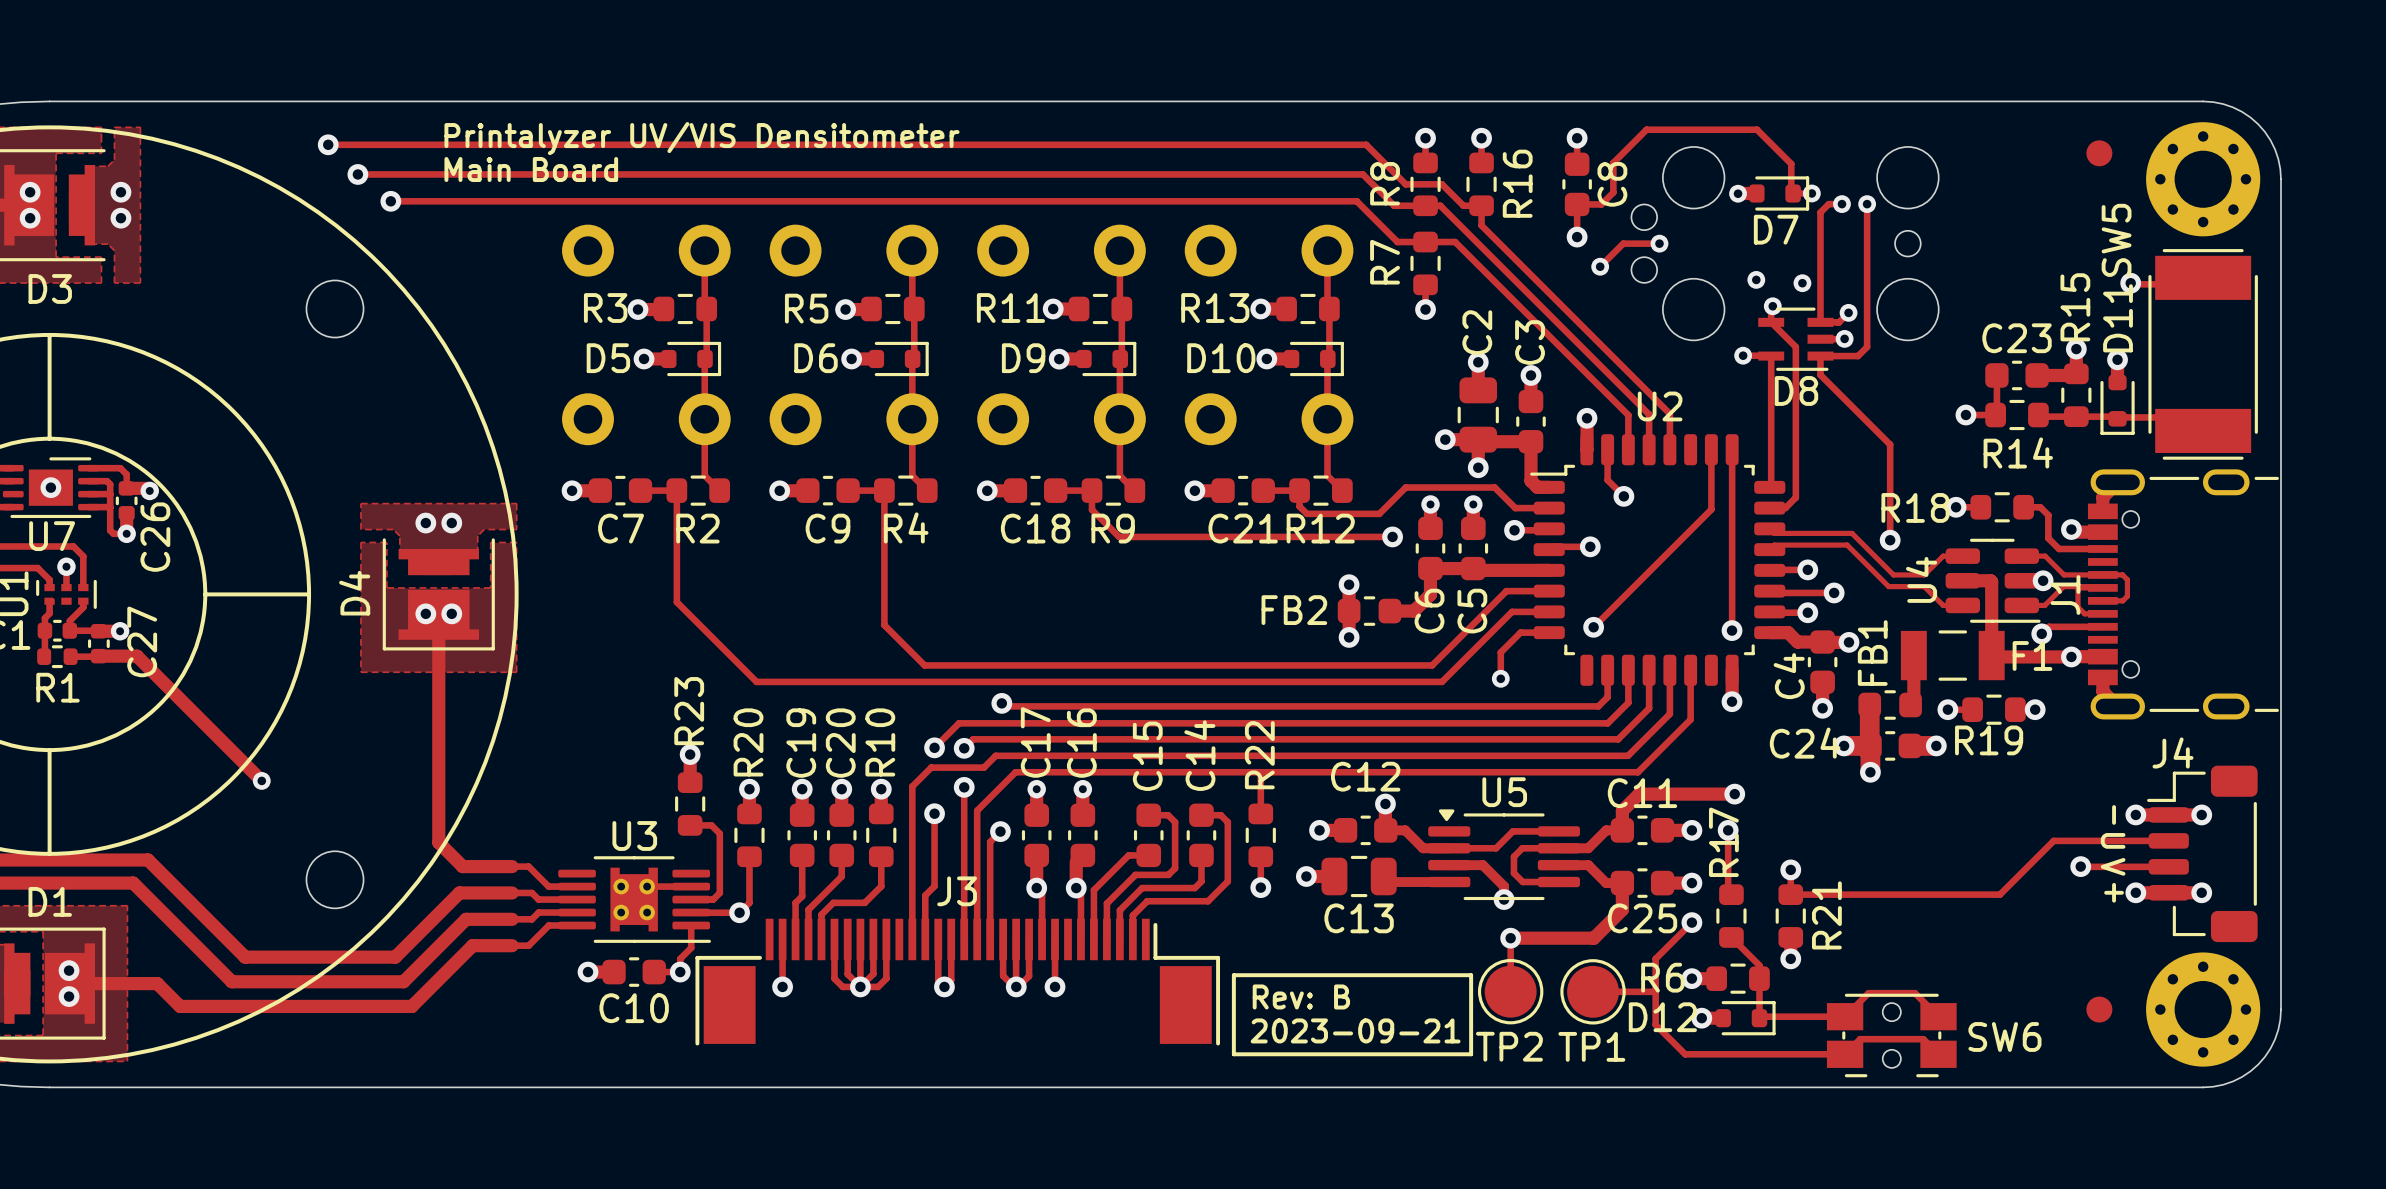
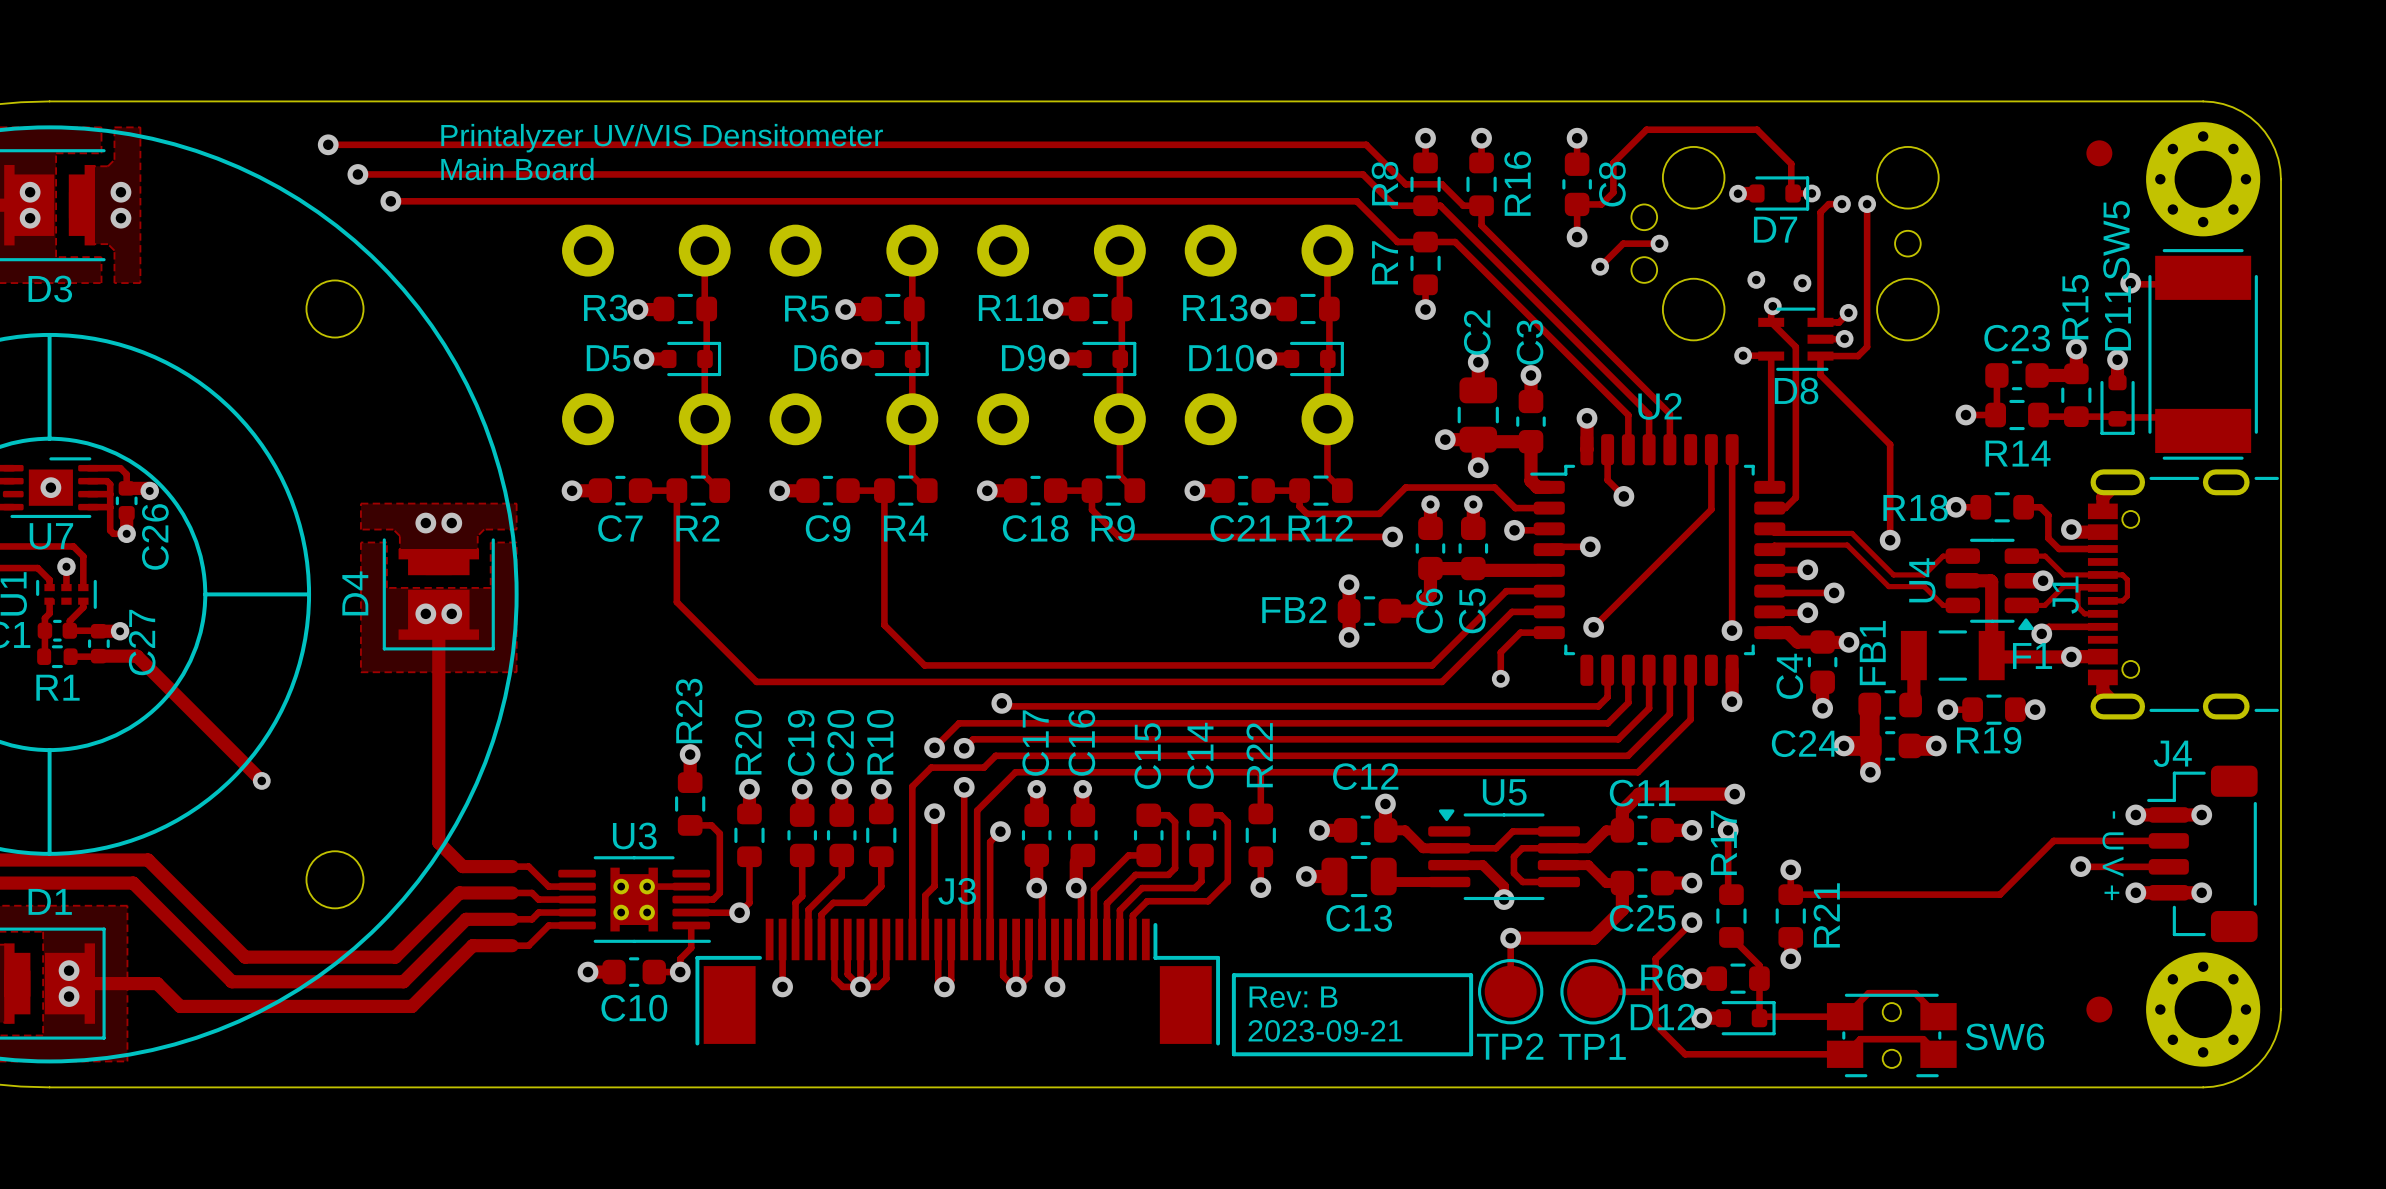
U4 footprint: [1945, 538, 2041, 623] -> [1945, 538, 2040, 631]

